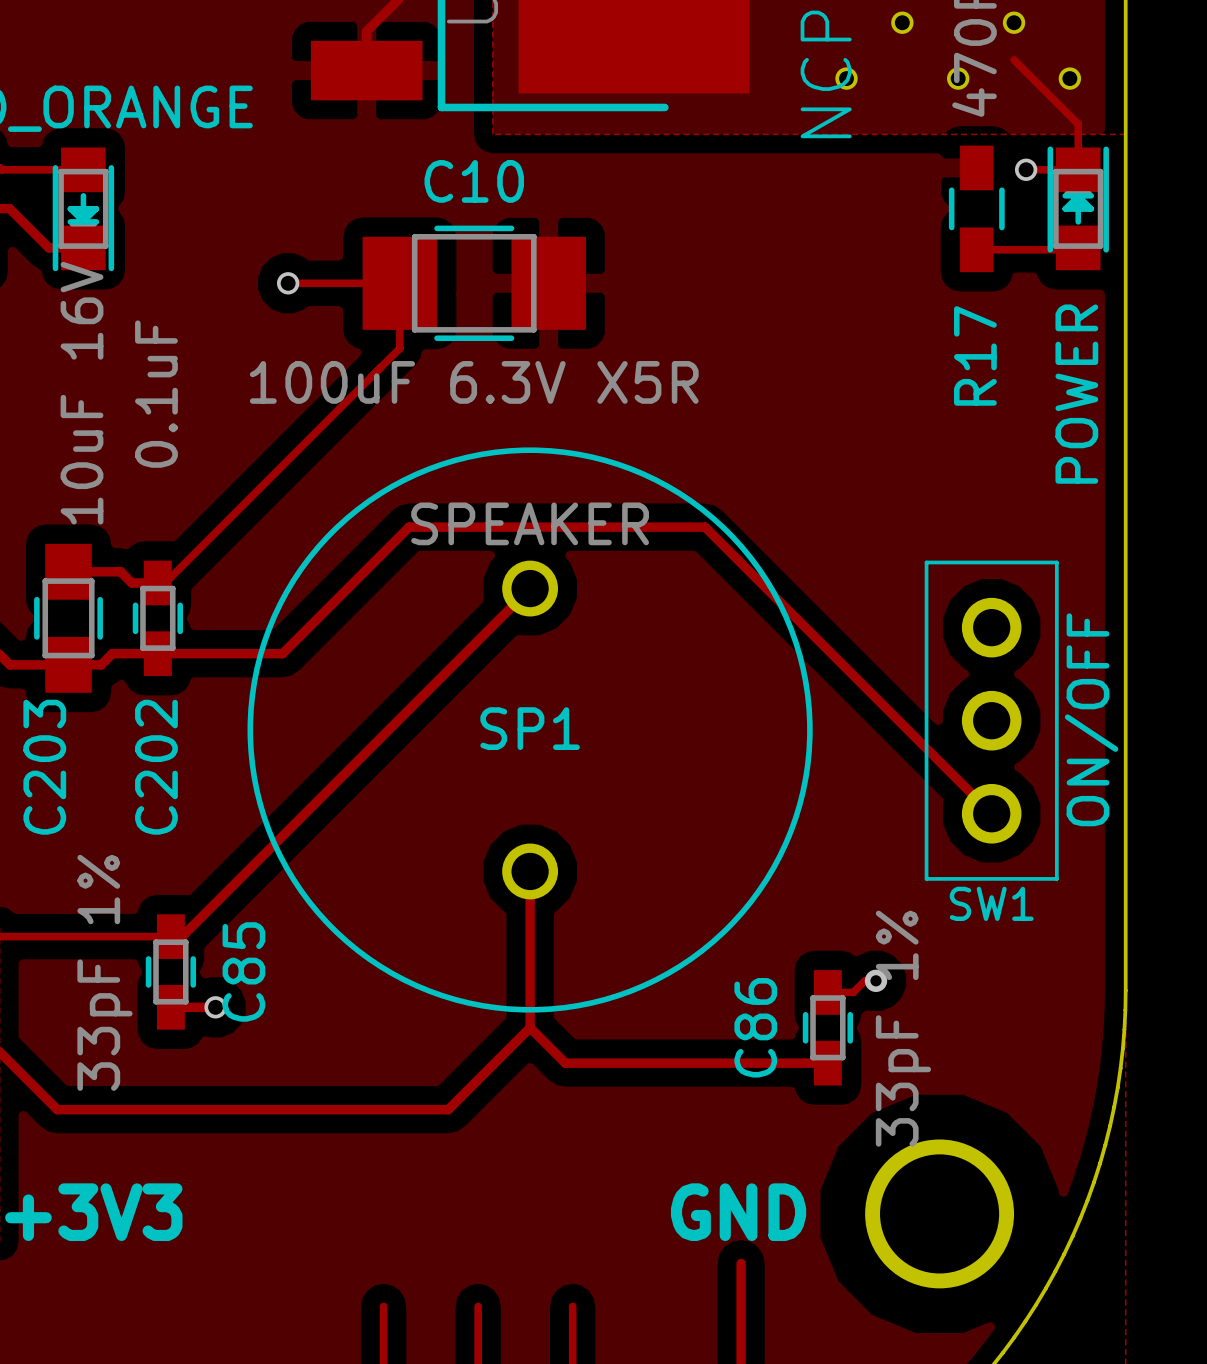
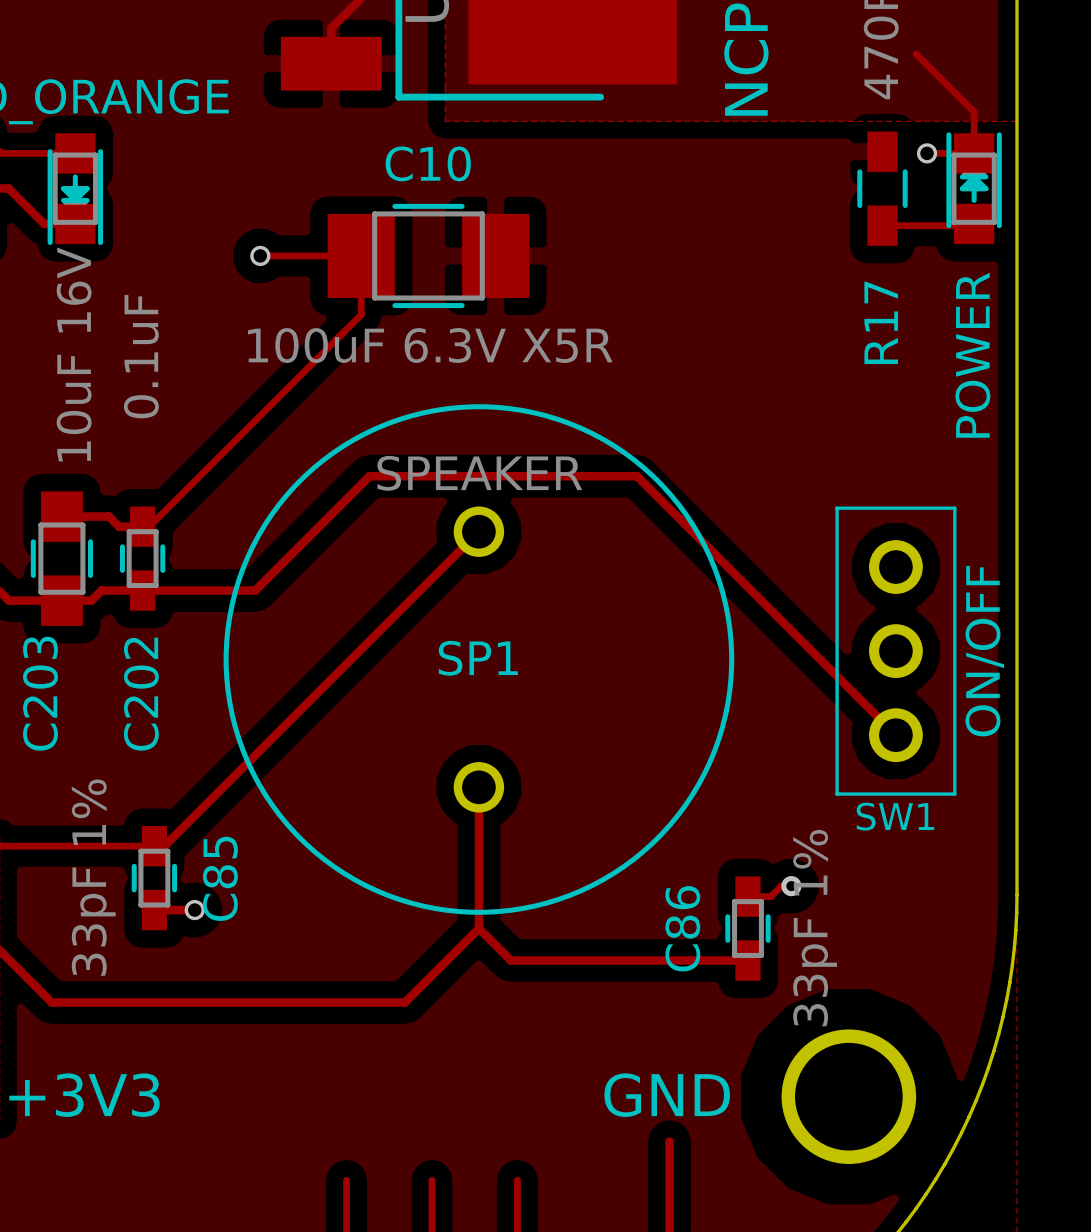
part: (902, 22) -> none
part: (1014, 22) -> none
part: (846, 78) -> none
part: (958, 78) -> none
part: (1069, 78) -> none

